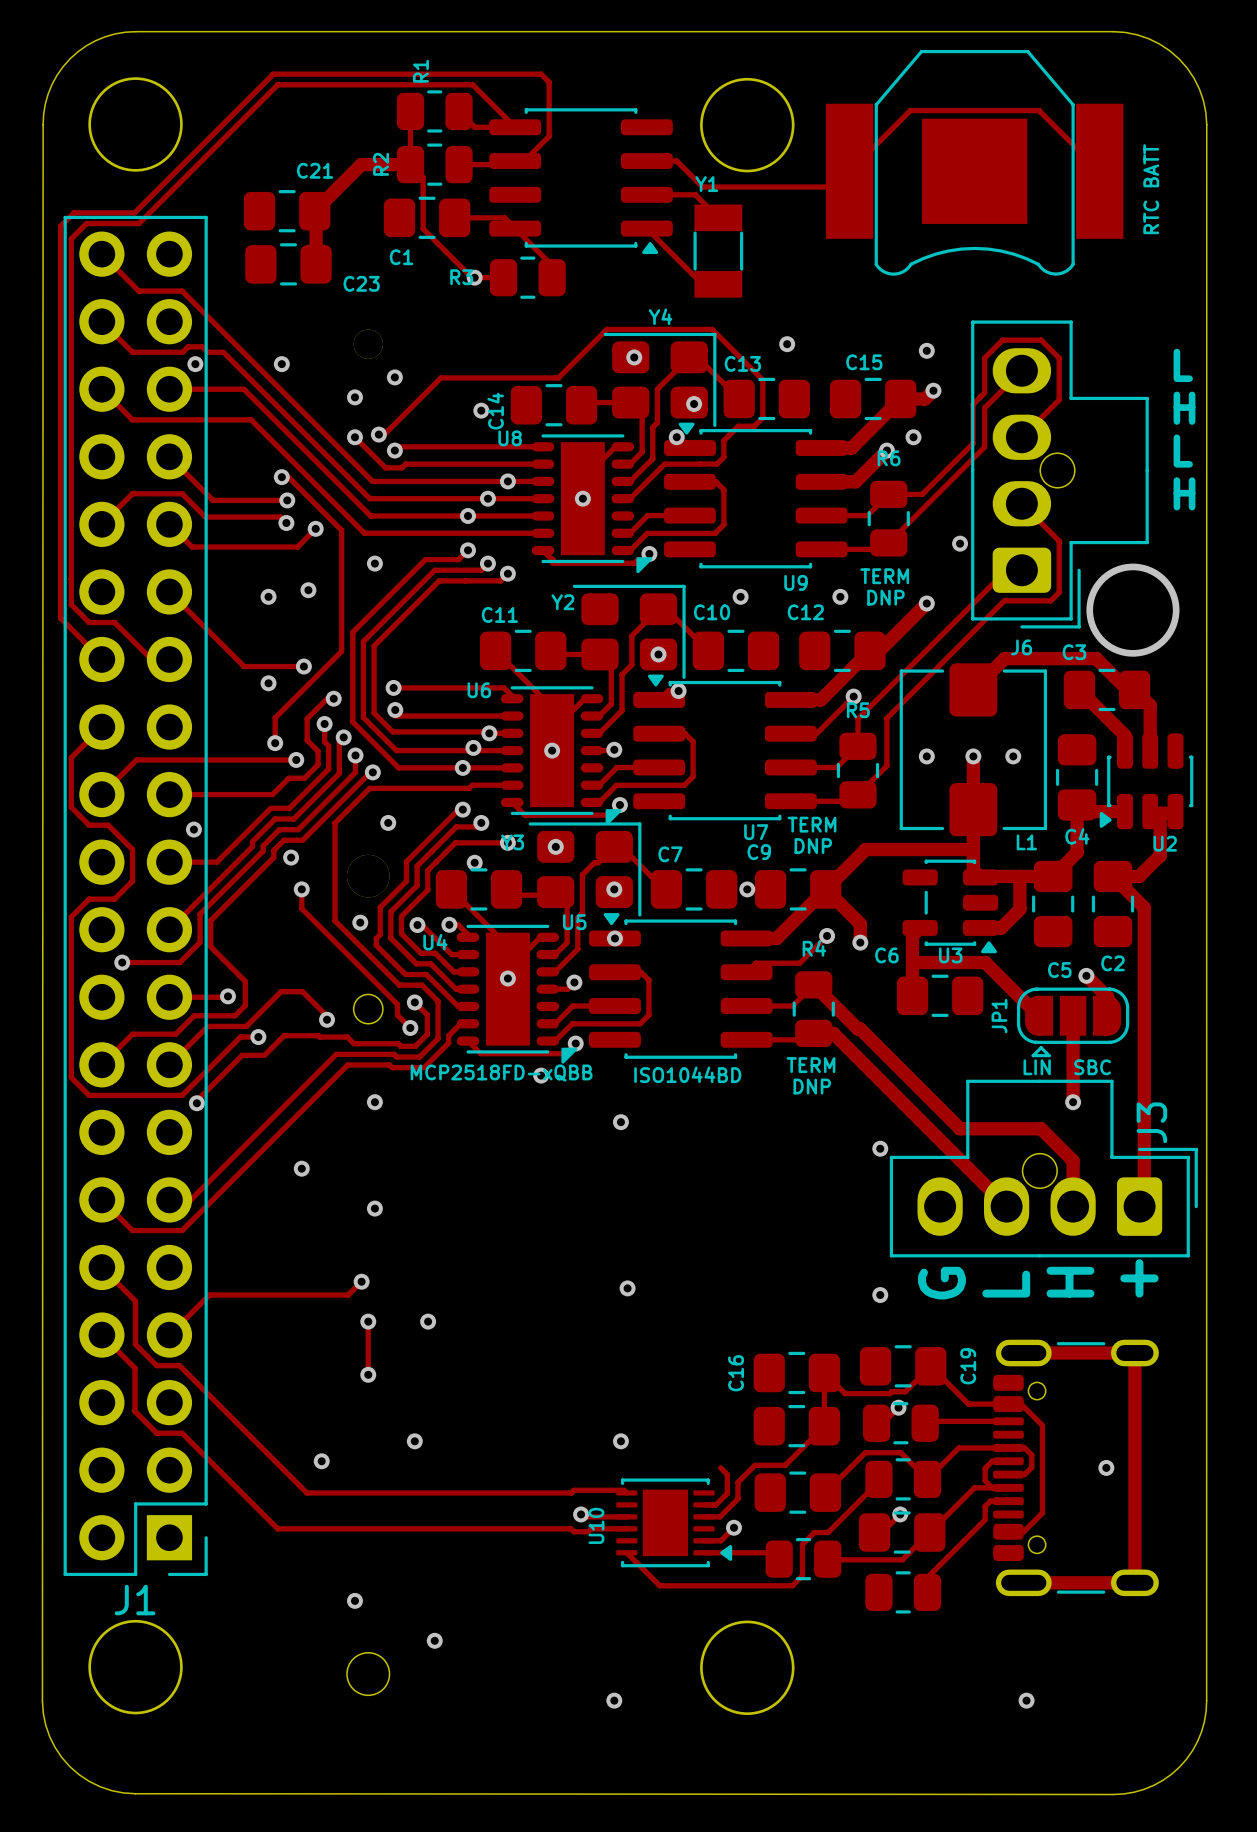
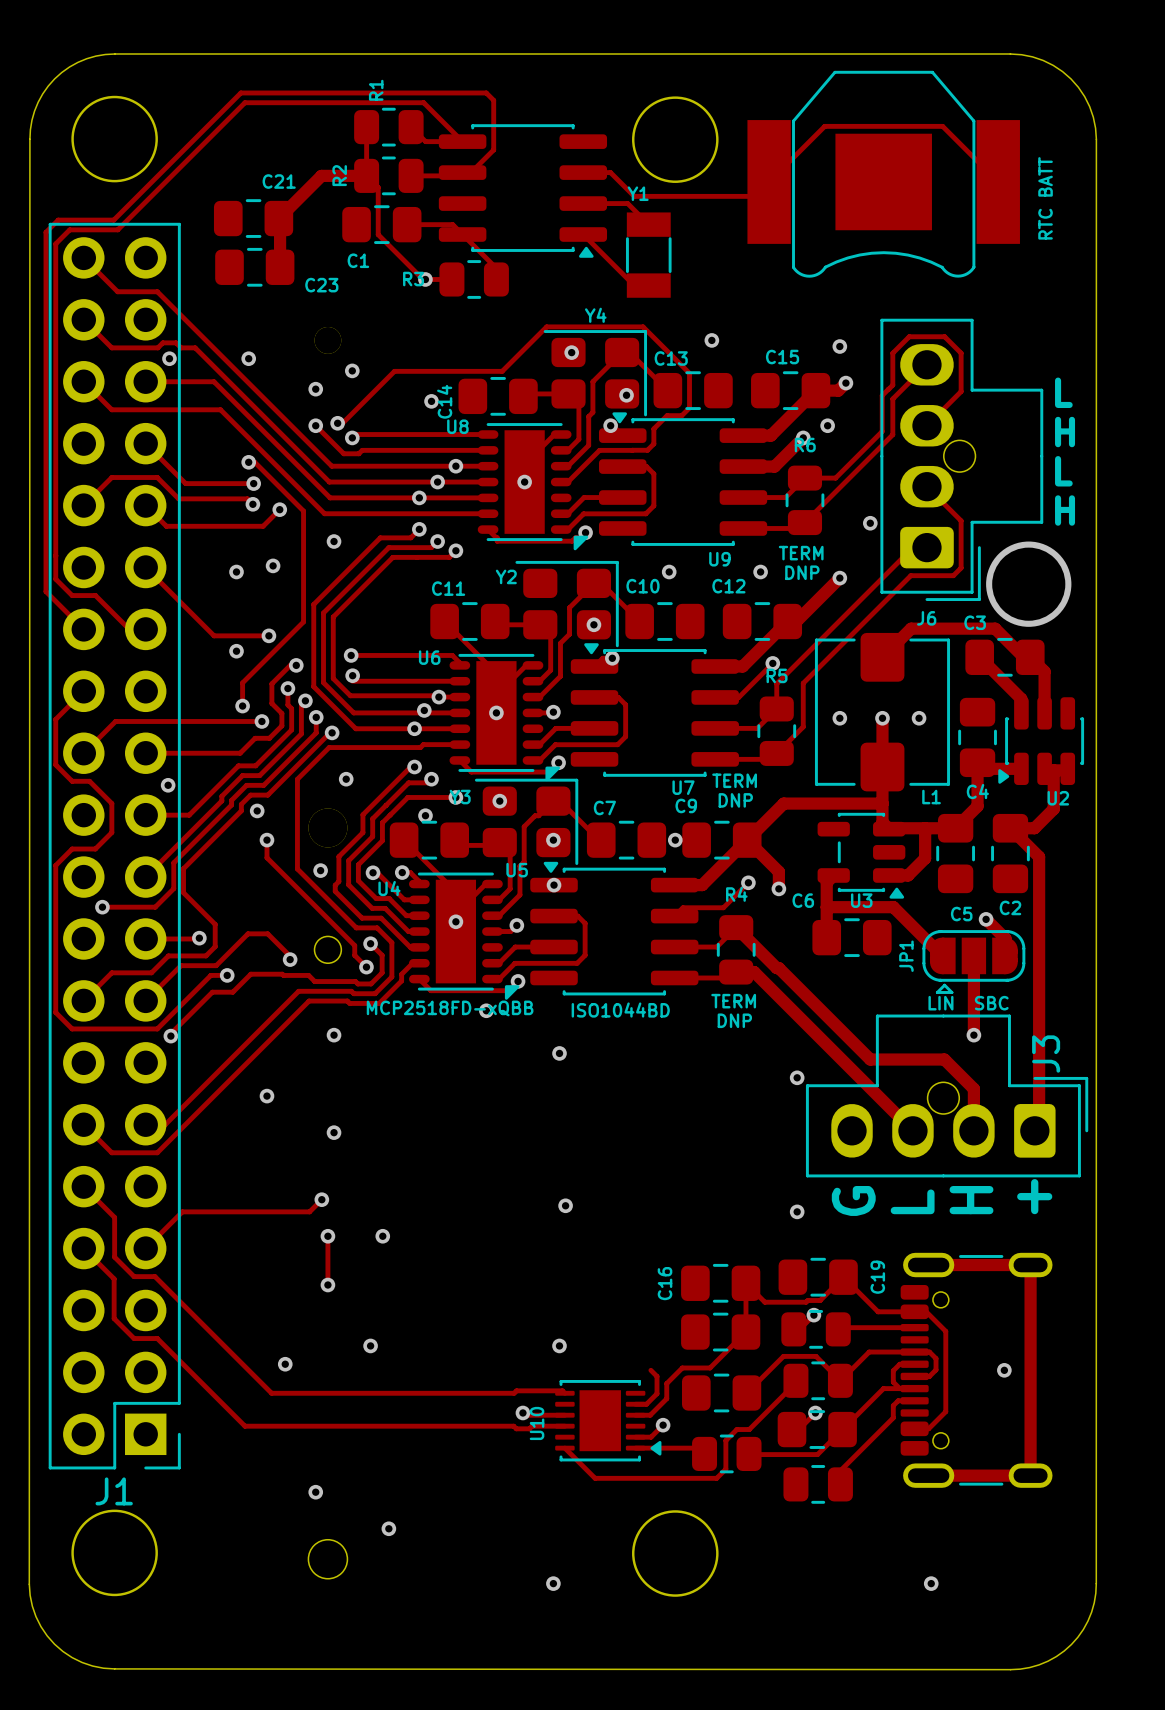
text: L (1183, 365) -> none
text: H (1184, 408) -> L (1063, 392)
text: L (1183, 451) -> H (1065, 432)
text: H (1184, 493) -> L (1063, 471)
text: none -> H (1065, 510)

